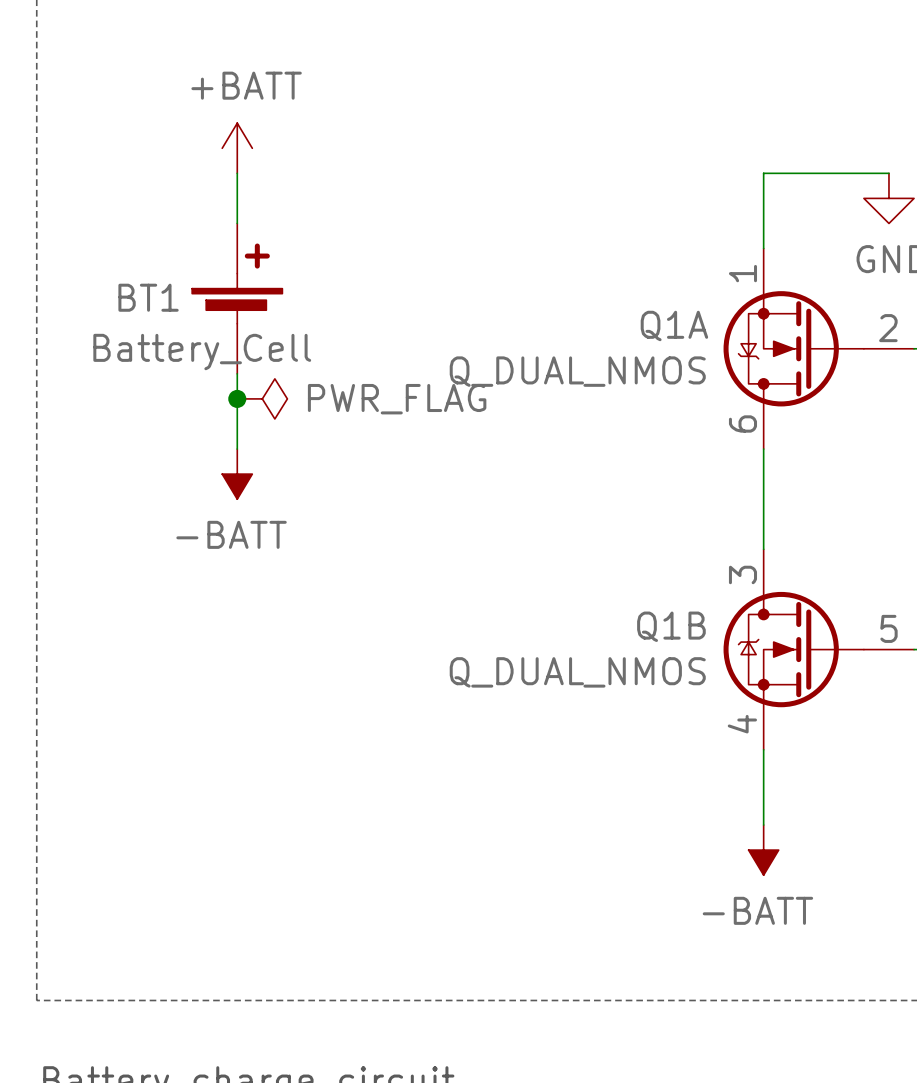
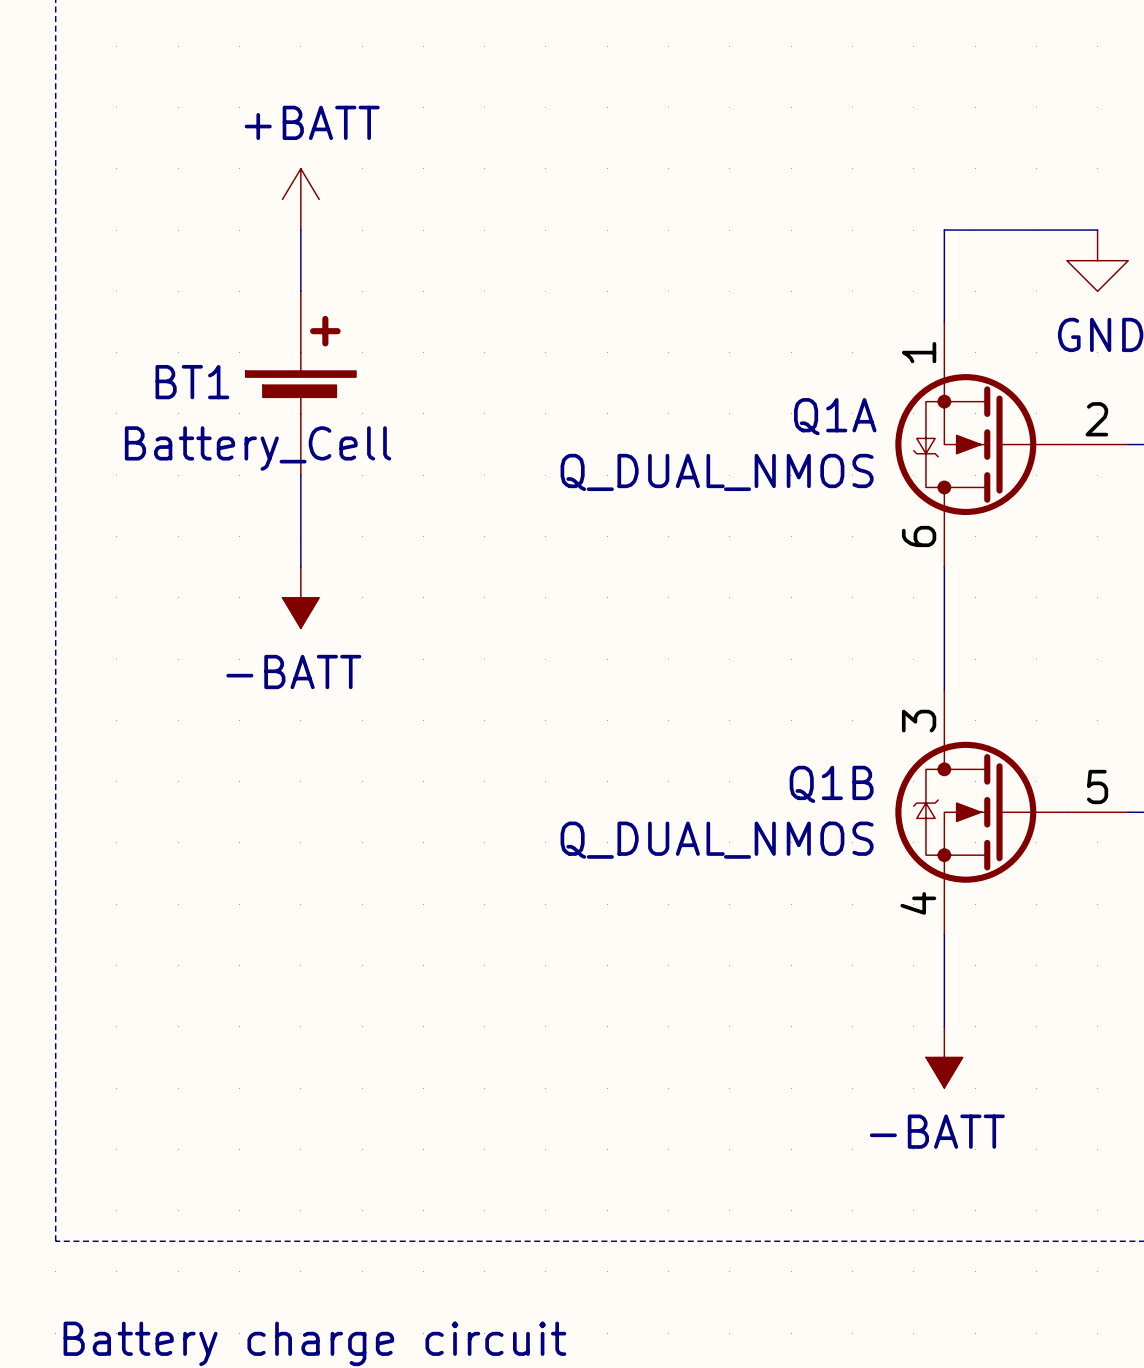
junction: (237, 398) -> none
power symbol: PWR_FLAG (262, 398) -> none

